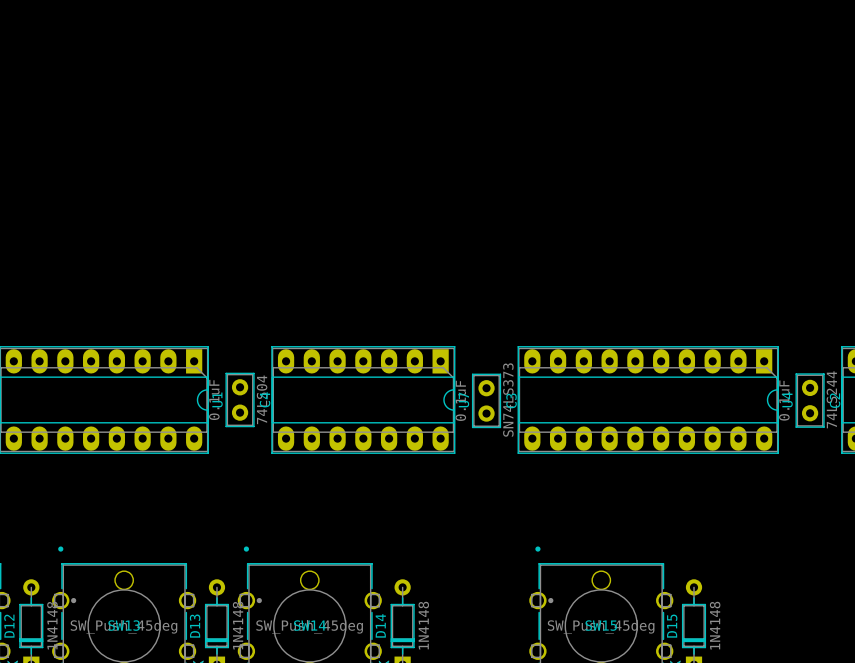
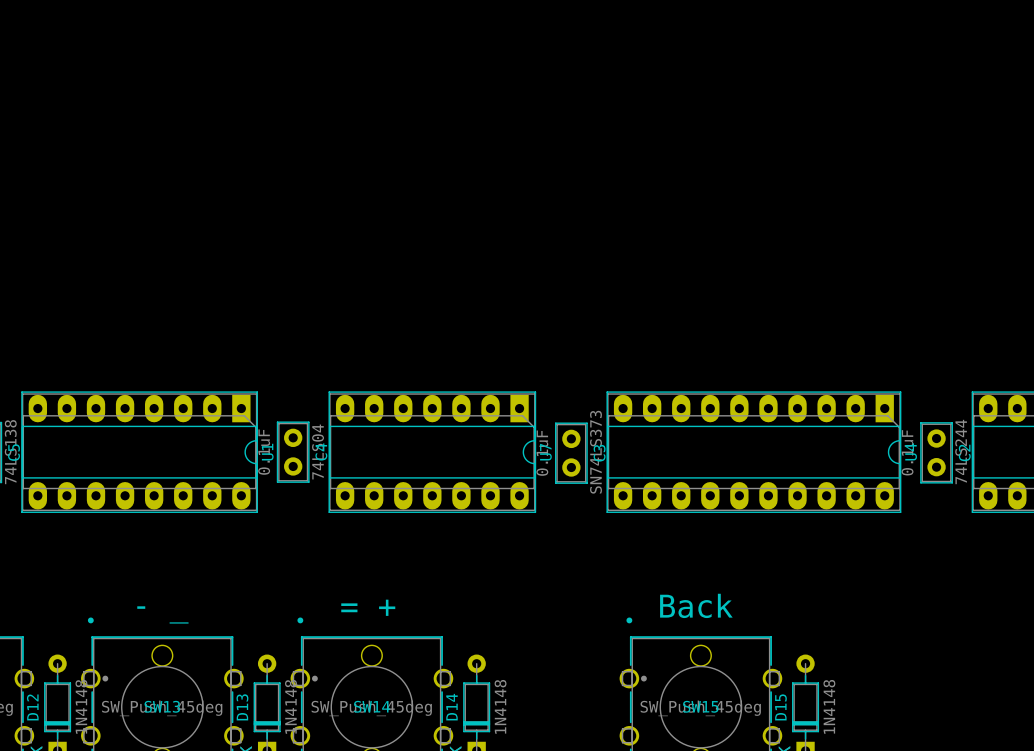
text: none -> Back (696, 605)
text: none -> = + (368, 607)
text: none -> - _ (162, 614)

